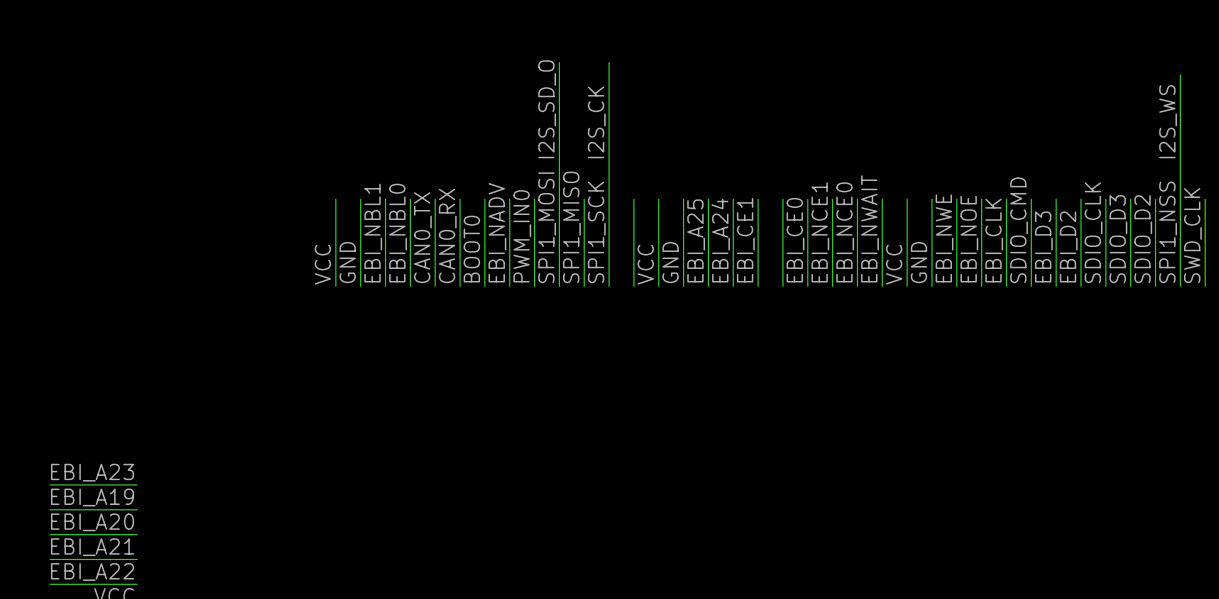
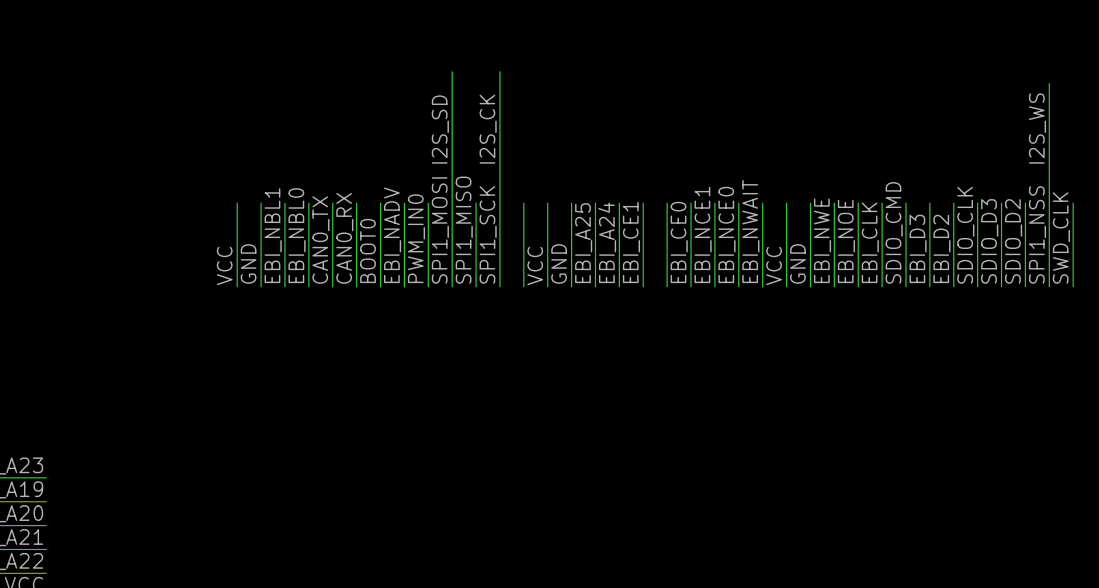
label: I2S_SD_O (547, 109) -> I2S_SD (440, 129)

